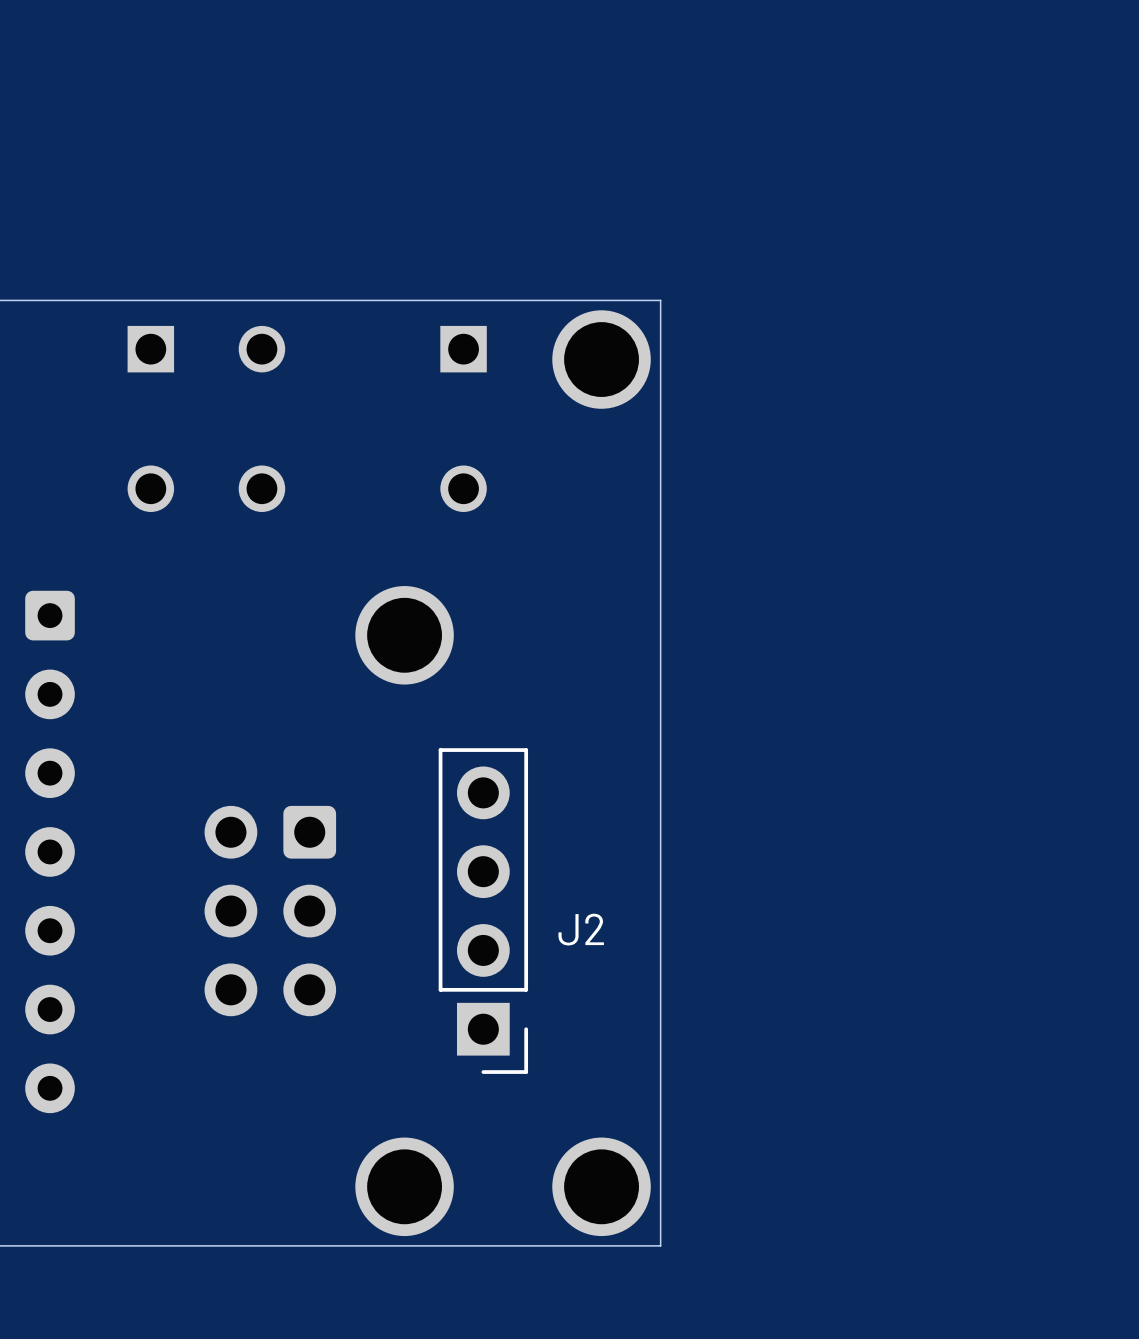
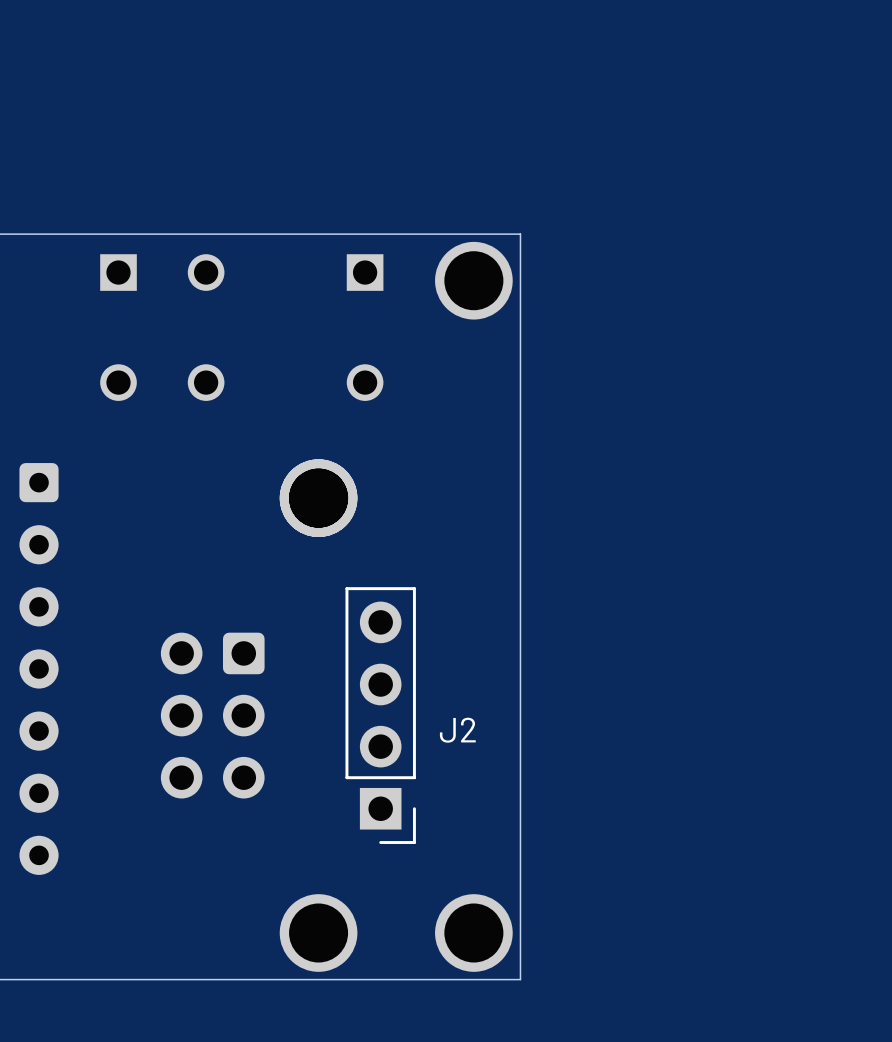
part: none -> (318, 498)

